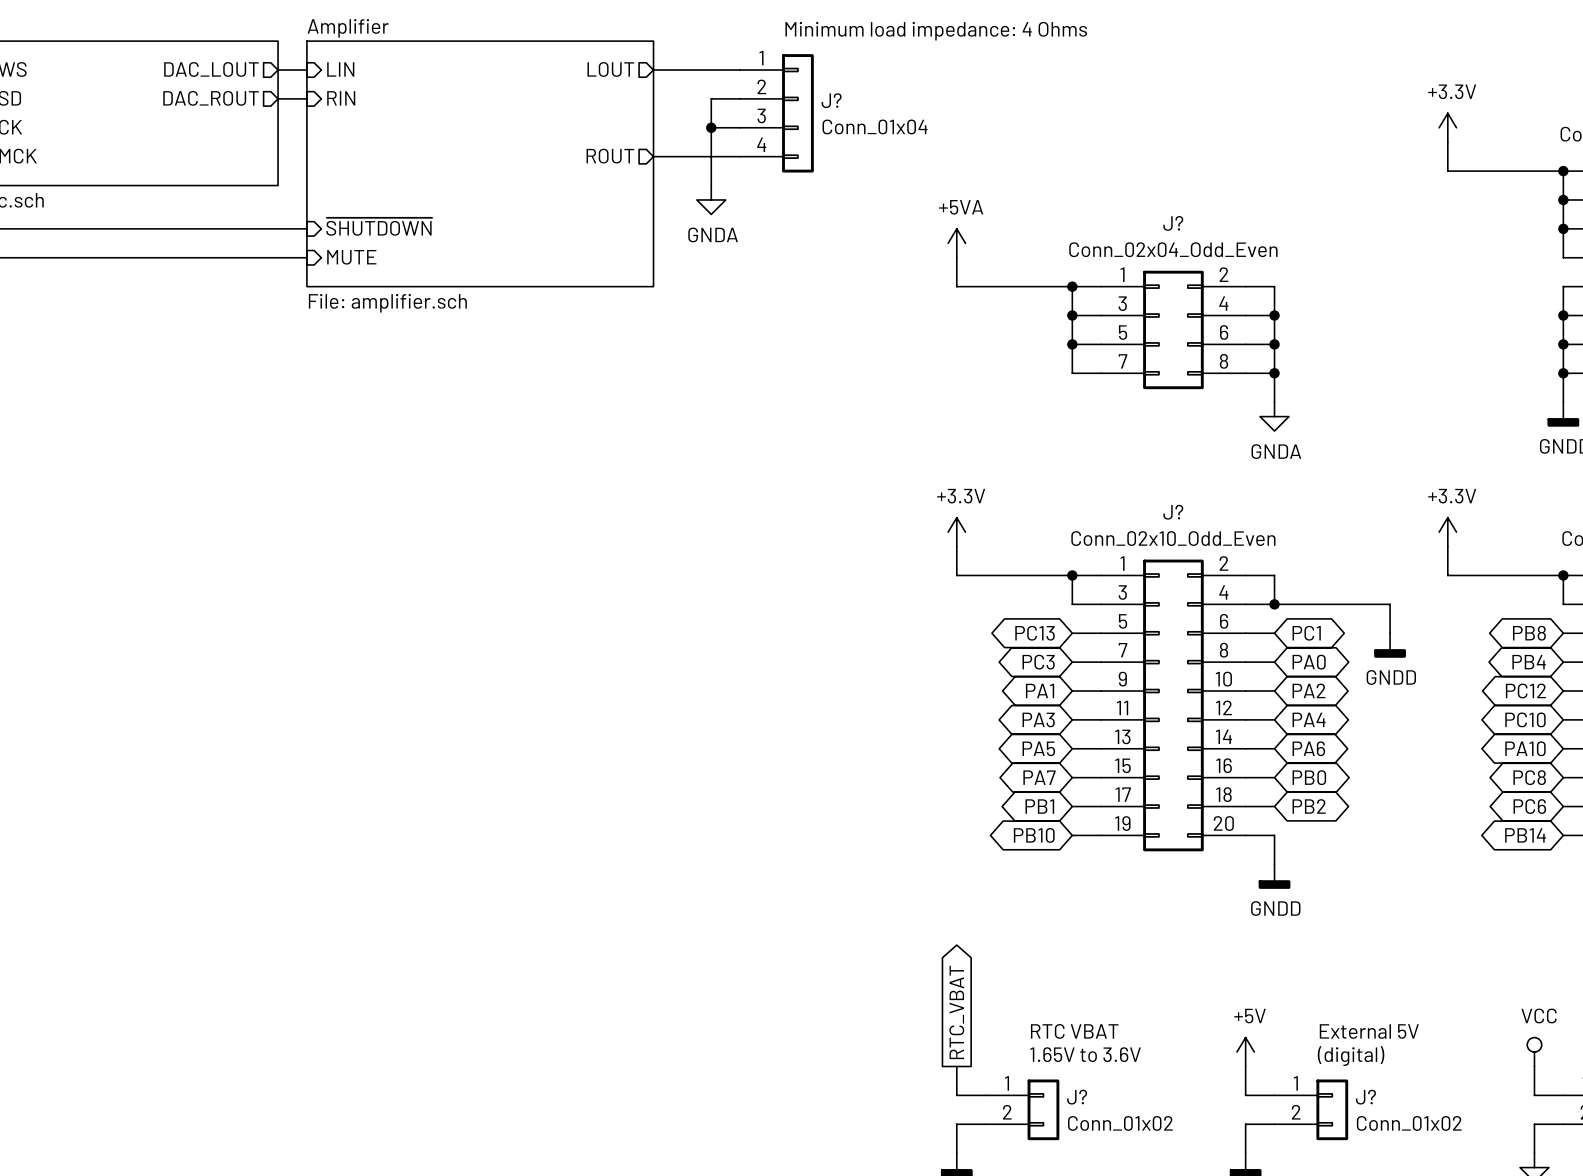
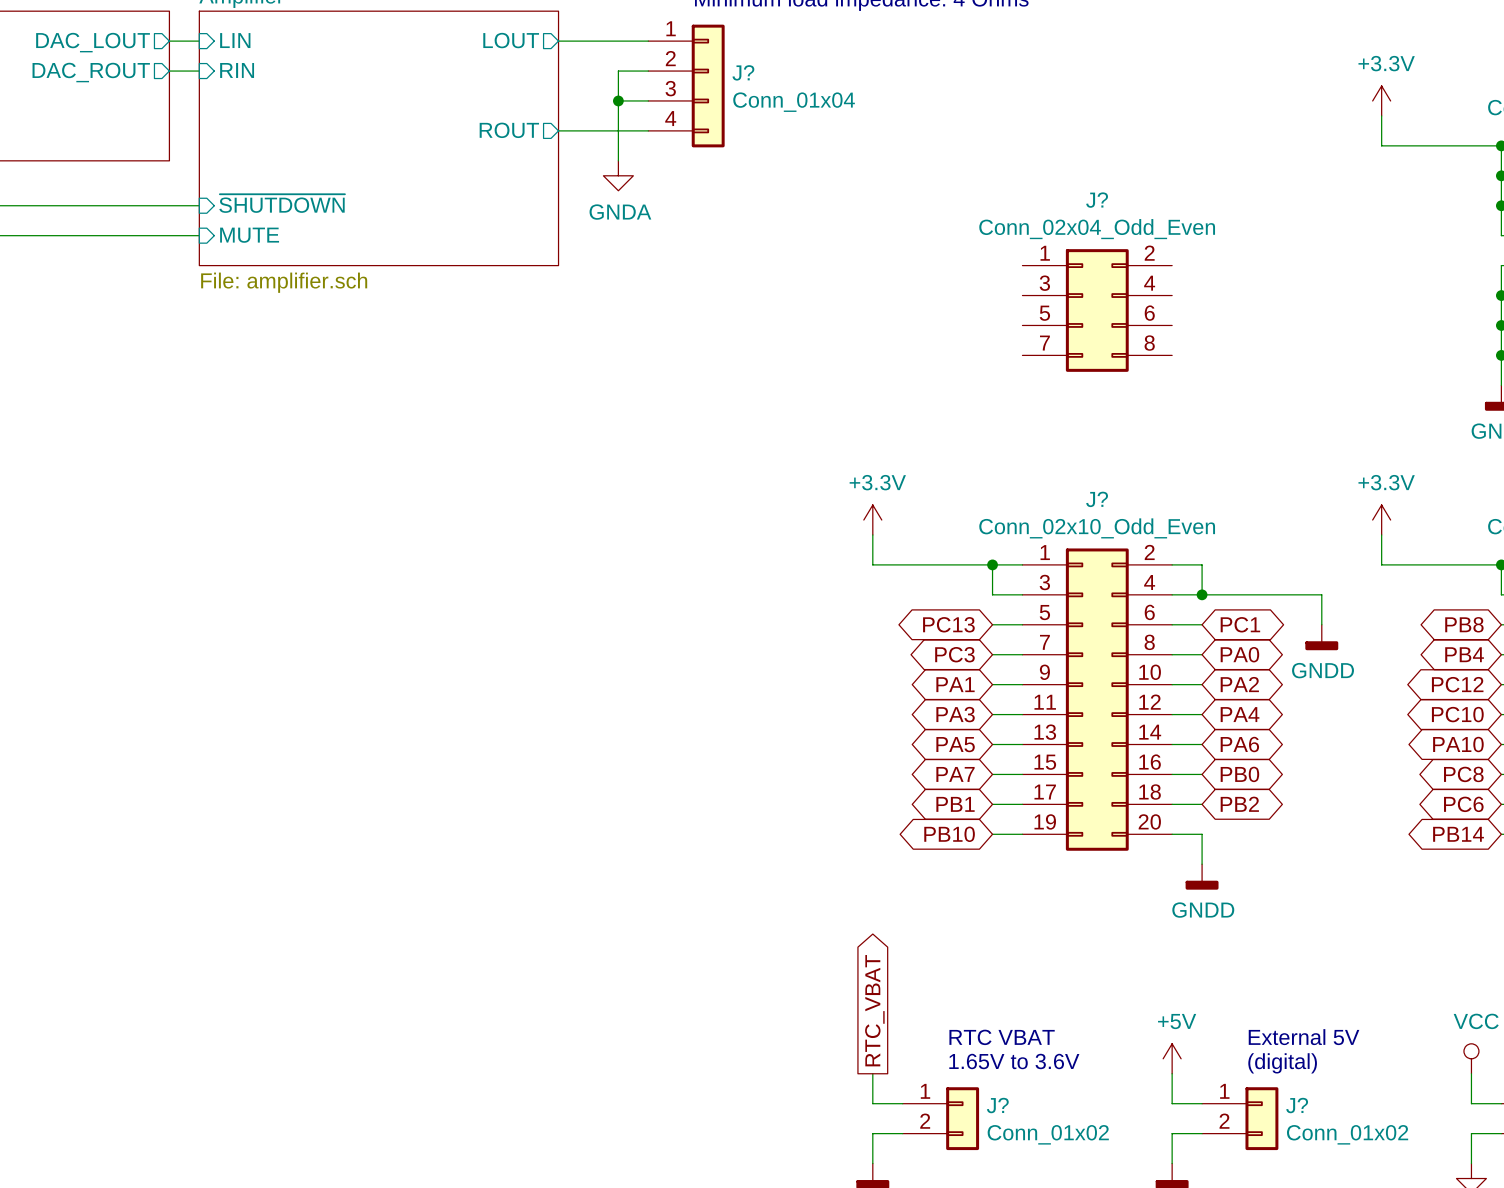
power symbol: +5VA (956, 243) -> none
wire: (956, 257) (956, 286) (1101, 286) -> none
wire: (1072, 286) (1072, 373) (1101, 373) -> none
junction: (1072, 286) -> none
wire: (1245, 286) (1274, 286) (1274, 402) -> none
wire: (1072, 315) (1101, 315) -> none
junction: (1072, 315) -> none
wire: (1245, 315) (1274, 315) -> none
junction: (1274, 315) -> none
wire: (1072, 344) (1101, 344) -> none
junction: (1072, 344) -> none
wire: (1245, 344) (1274, 344) -> none
junction: (1274, 344) -> none
wire: (1245, 373) (1274, 373) -> none
junction: (1274, 373) -> none
power symbol: GNDA (1274, 416) -> none

